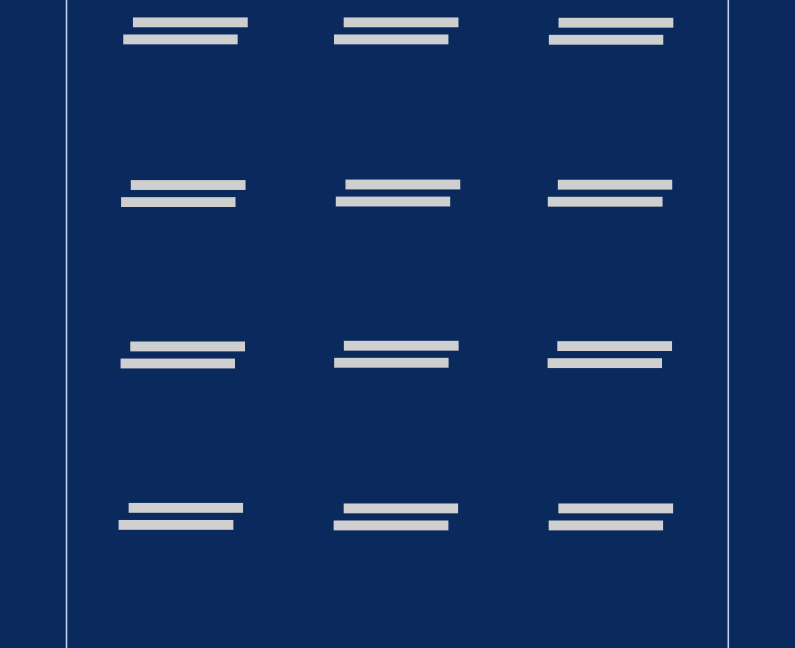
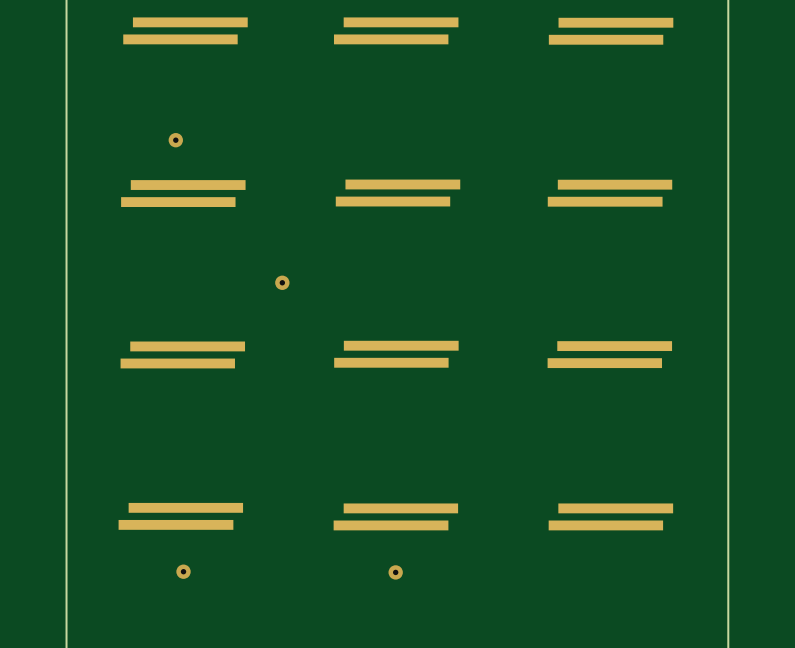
via: none -> (175, 140)
via: none -> (282, 282)
via: none -> (183, 571)
via: none -> (395, 572)

